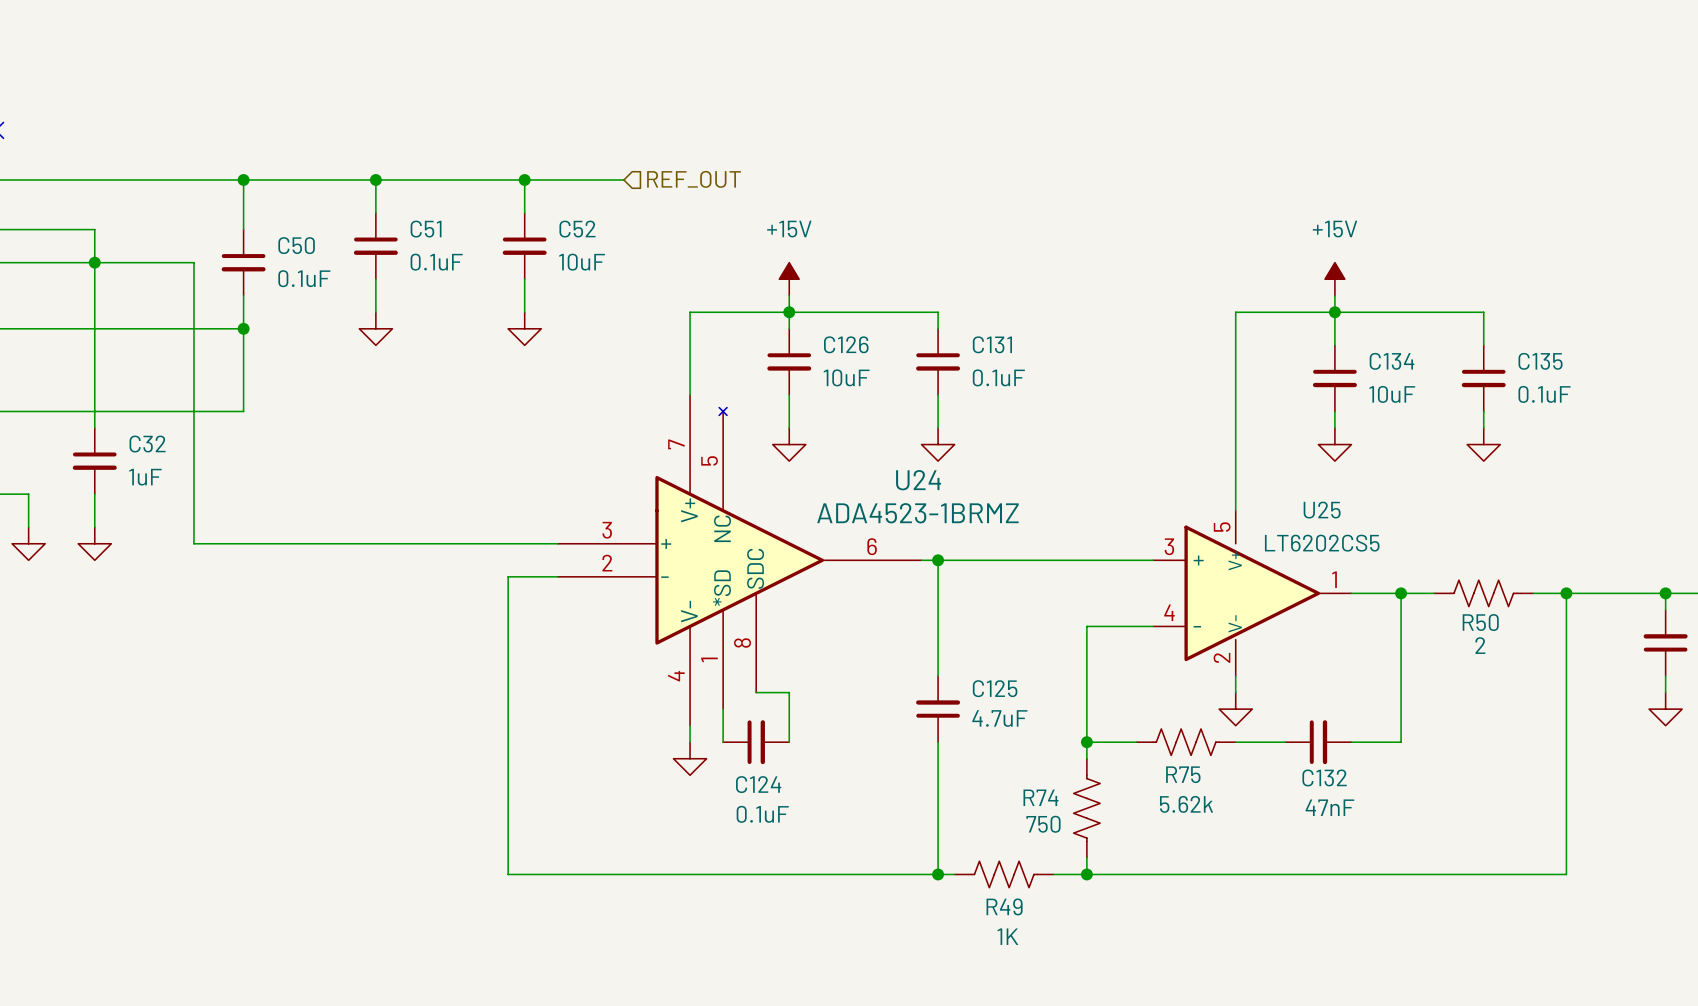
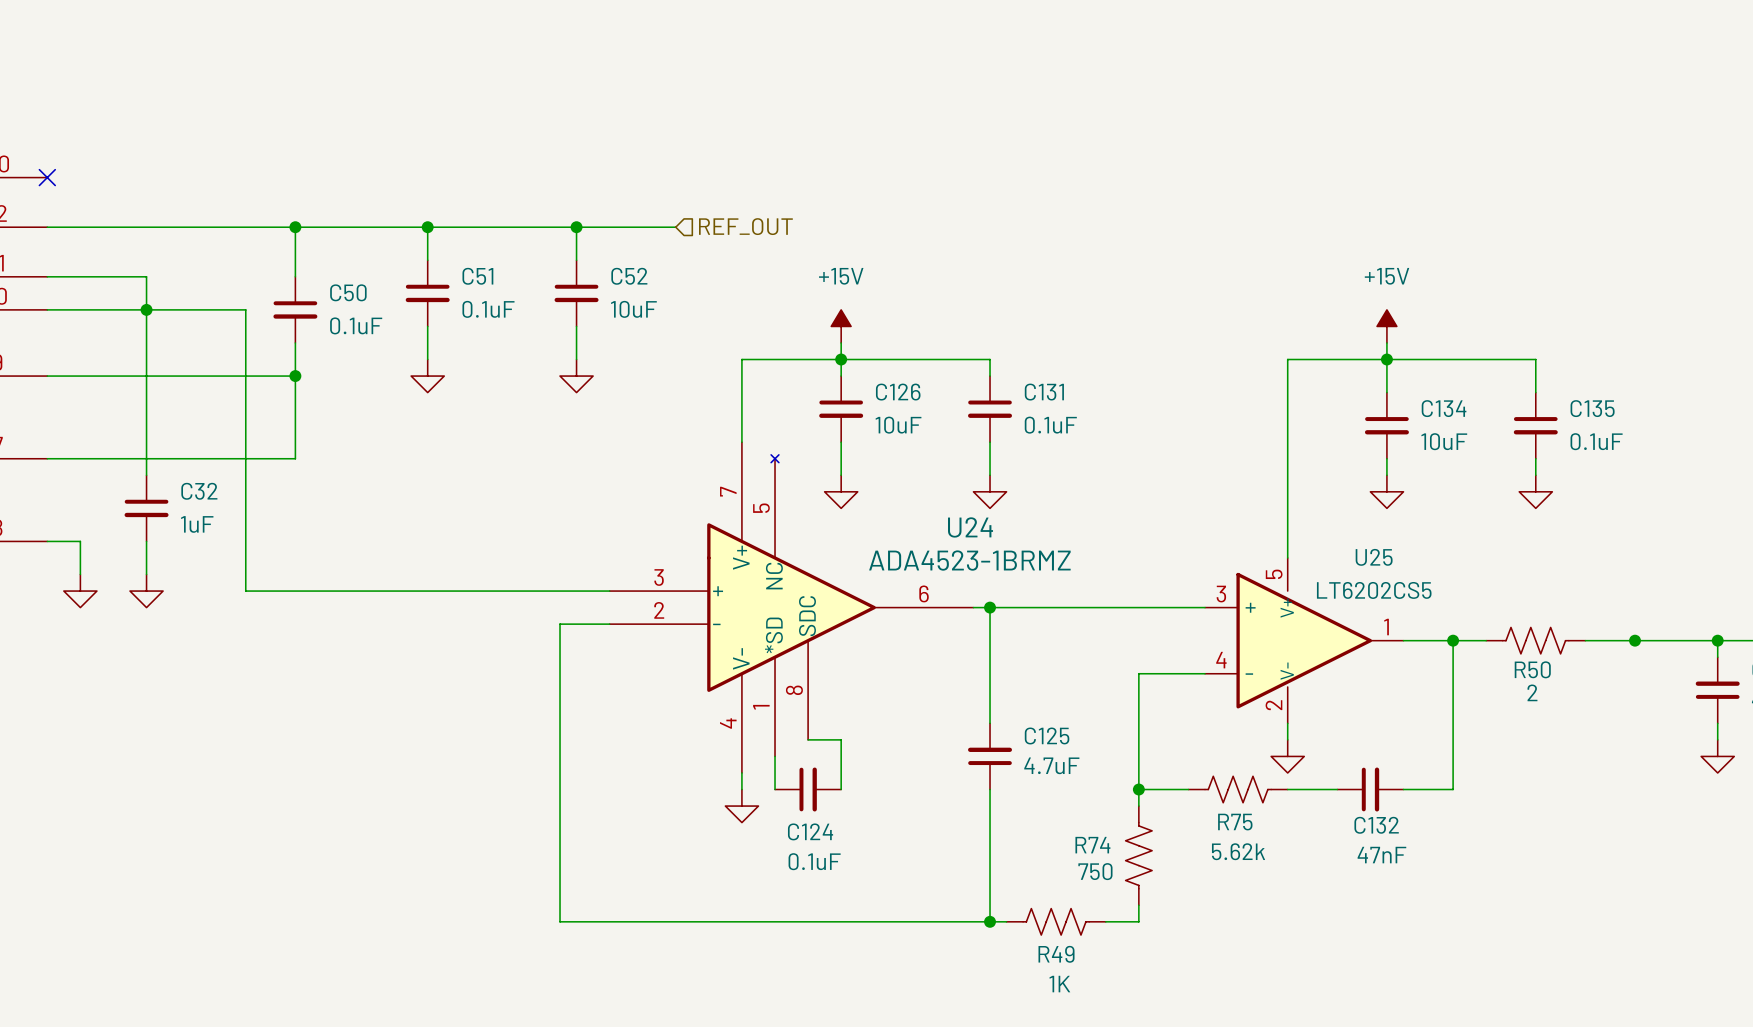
wire: (1566, 593) (1566, 874) (1086, 874) -> none
junction position: (1566, 593) -> (1635, 640)
junction: (1086, 874) -> none

